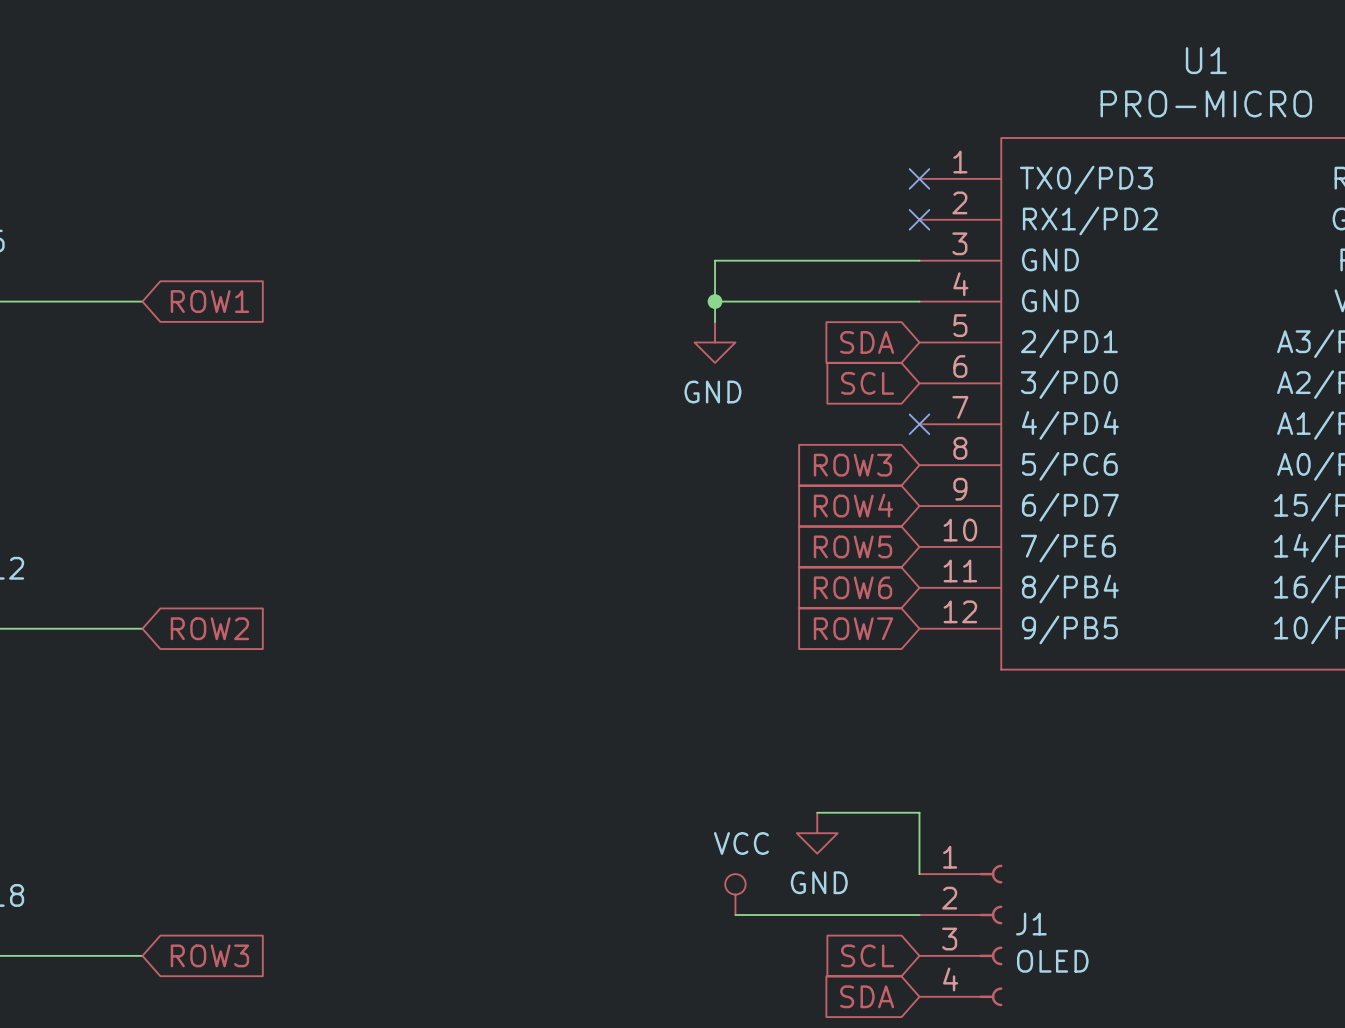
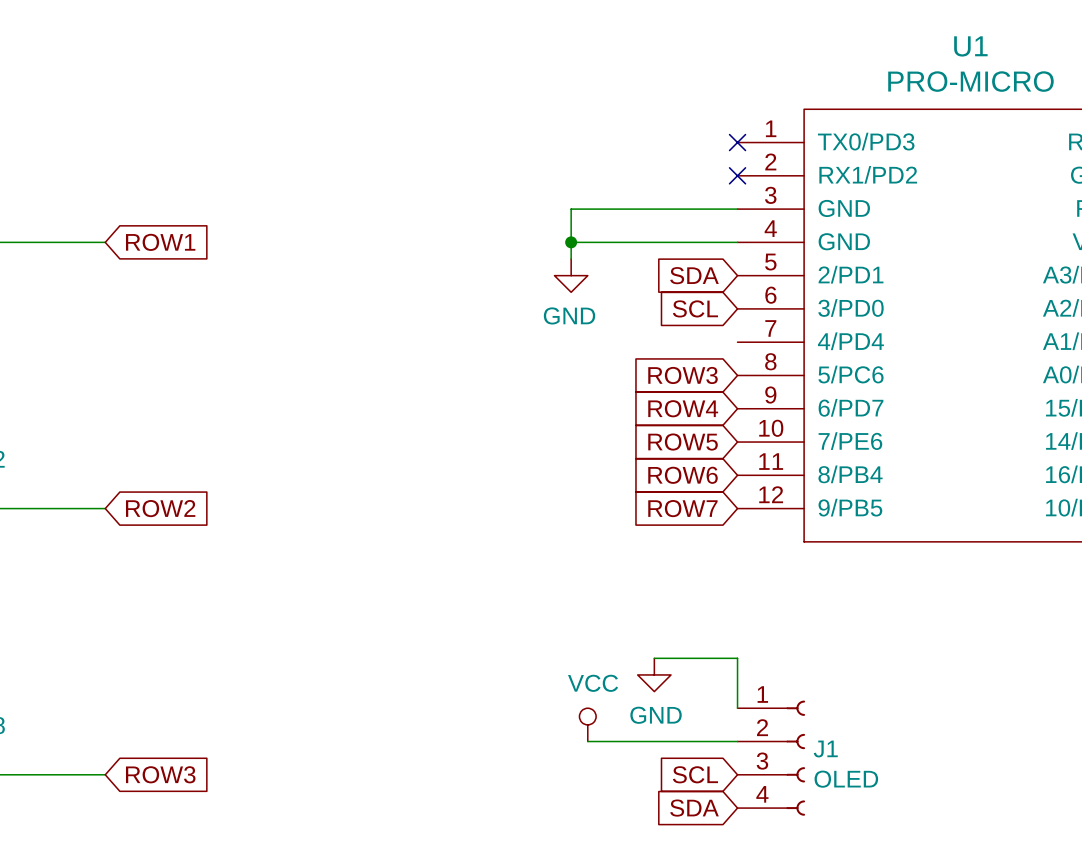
no-connect mark: (919, 424) -> none

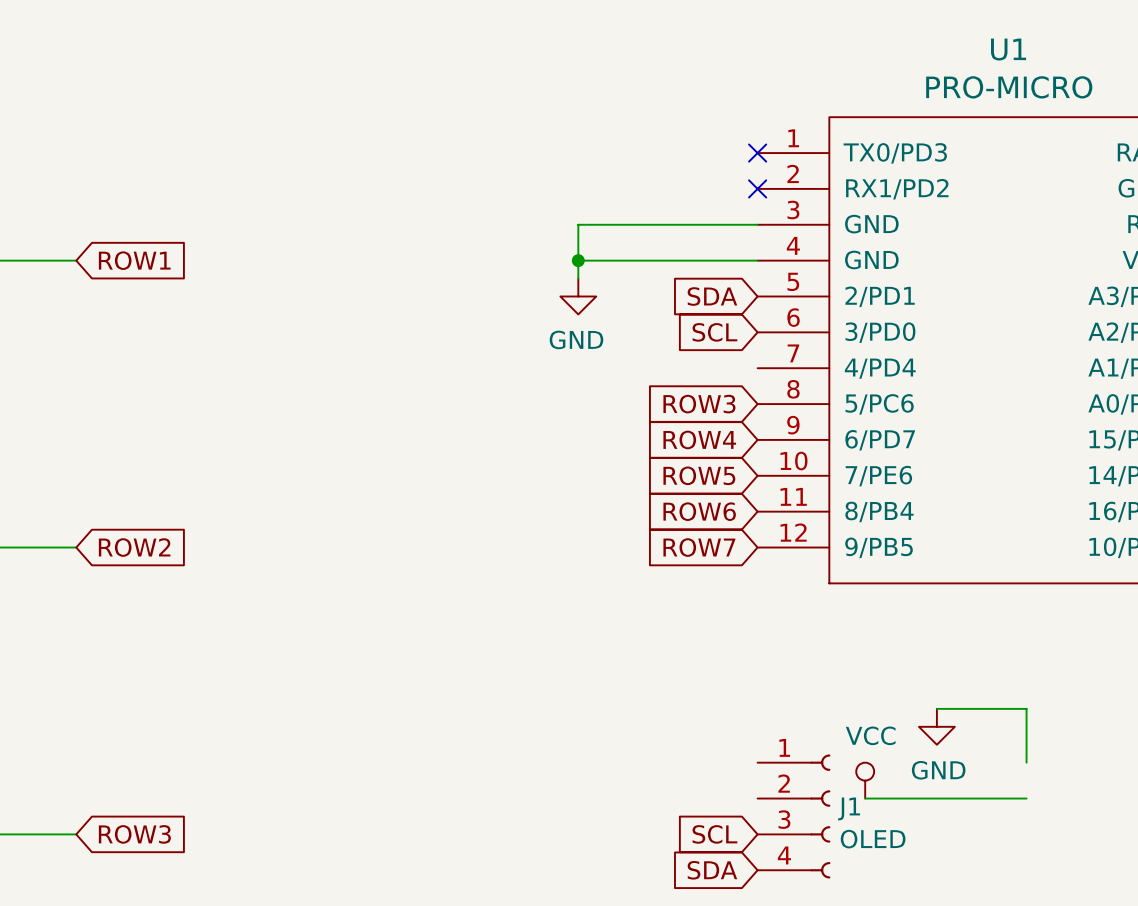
wire: (654, 658) (737, 658) (737, 708) -> (936, 708) (1026, 708) (1026, 762)
power symbol position: GND (654, 674) -> GND (936, 726)
power symbol position: VCC (587, 724) -> VCC (865, 780)
wire: (587, 741) (737, 741) -> (865, 798) (1026, 798)

